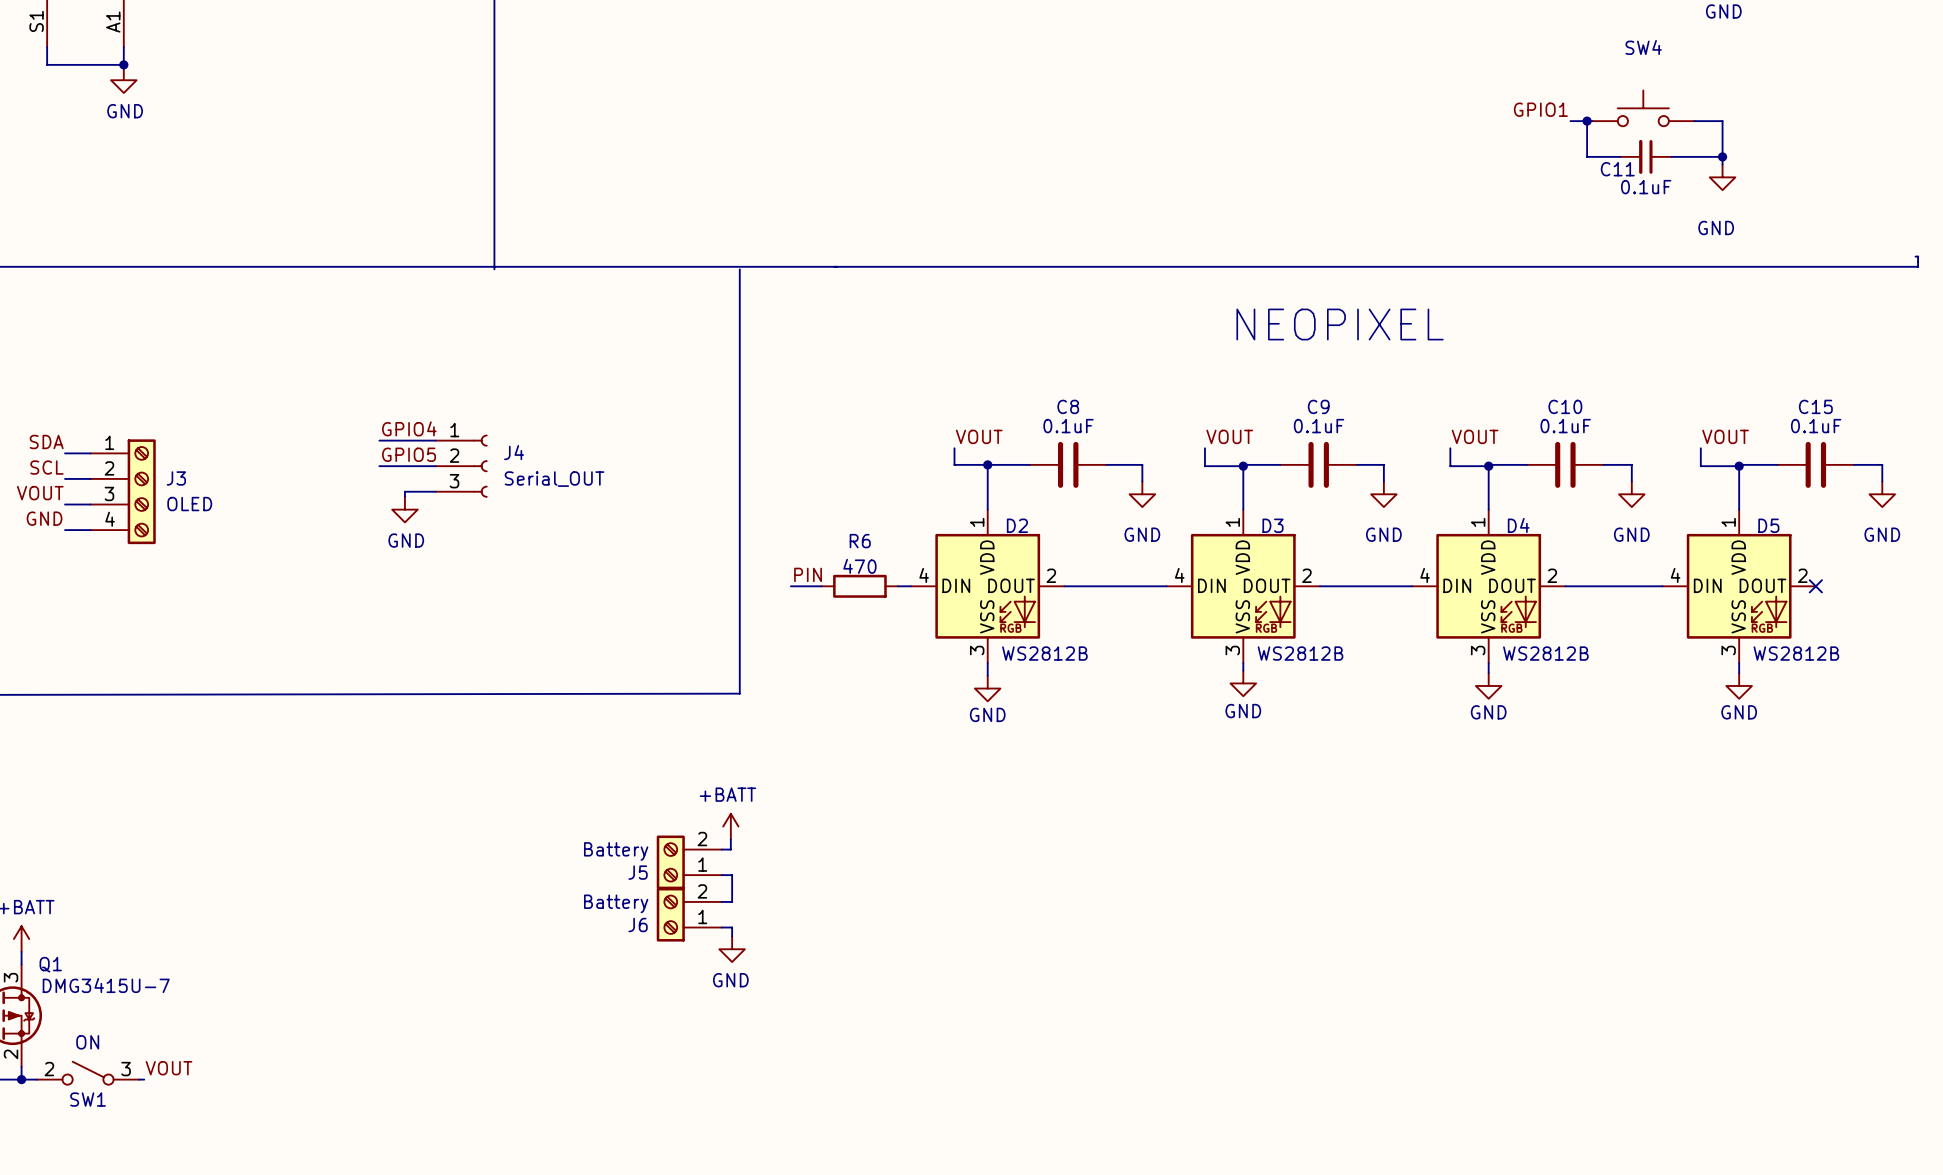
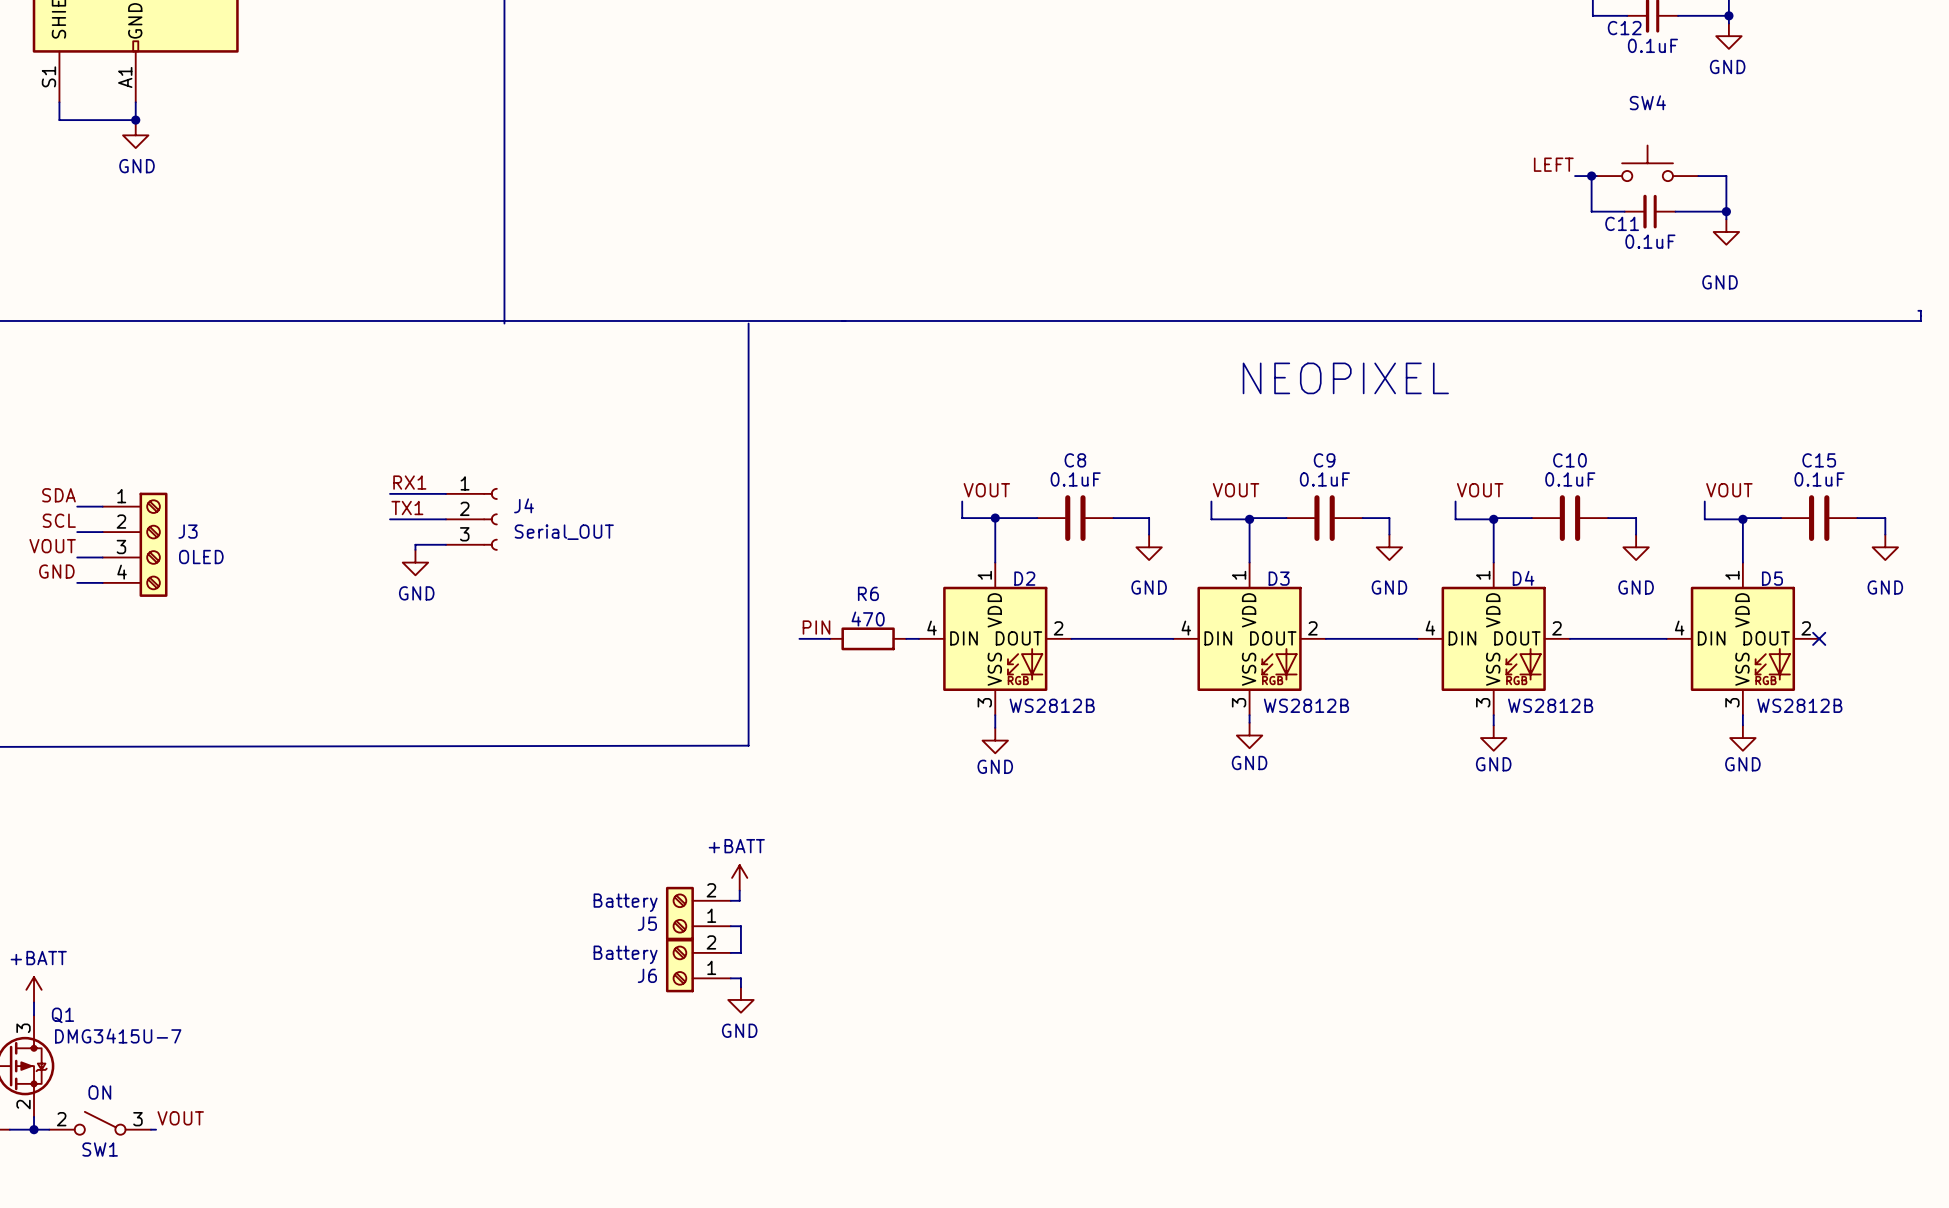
label: GPIO1 (1540, 109) -> LEFT (1553, 164)
label: GPIO4 (409, 428) -> RX1 (409, 482)
label: GPIO5 (409, 454) -> TX1 (407, 508)

